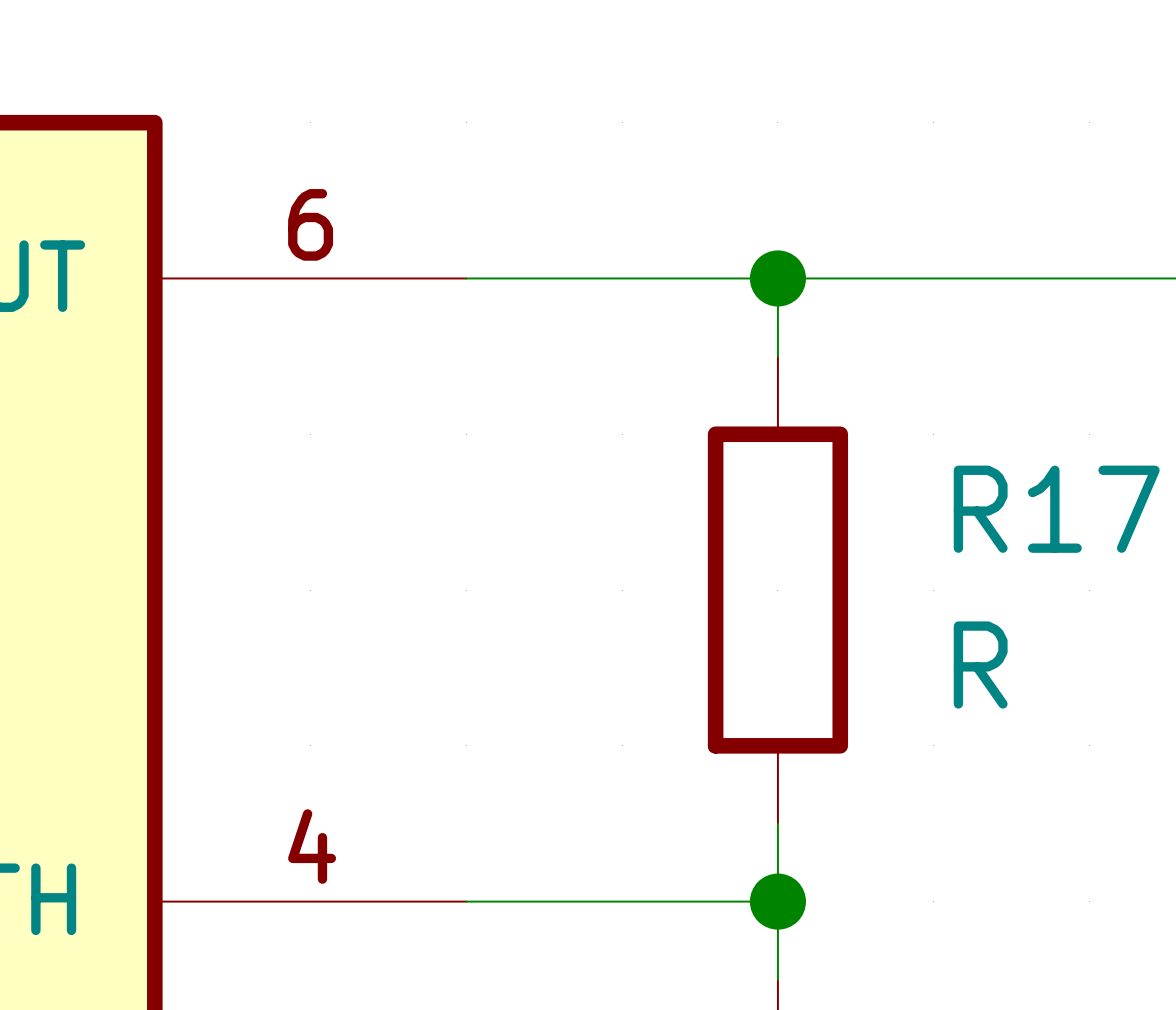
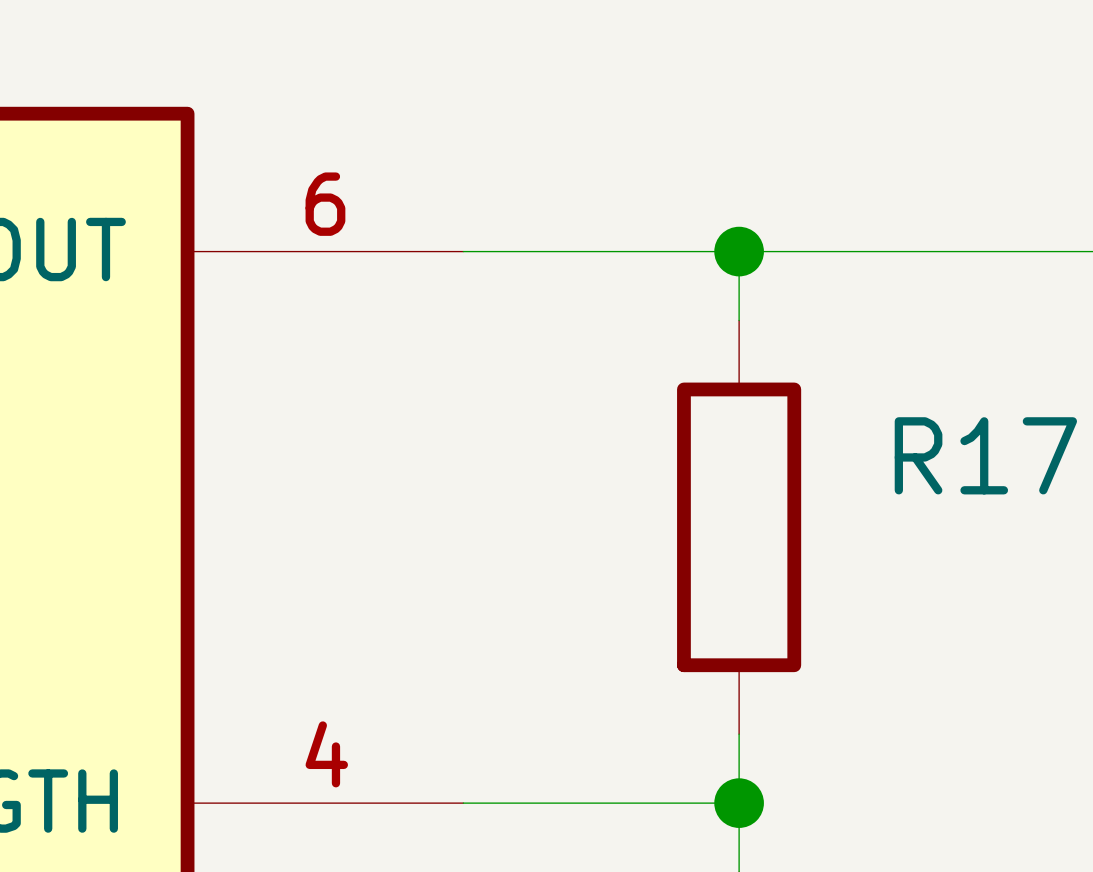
R17 value: R (980, 665) -> none

